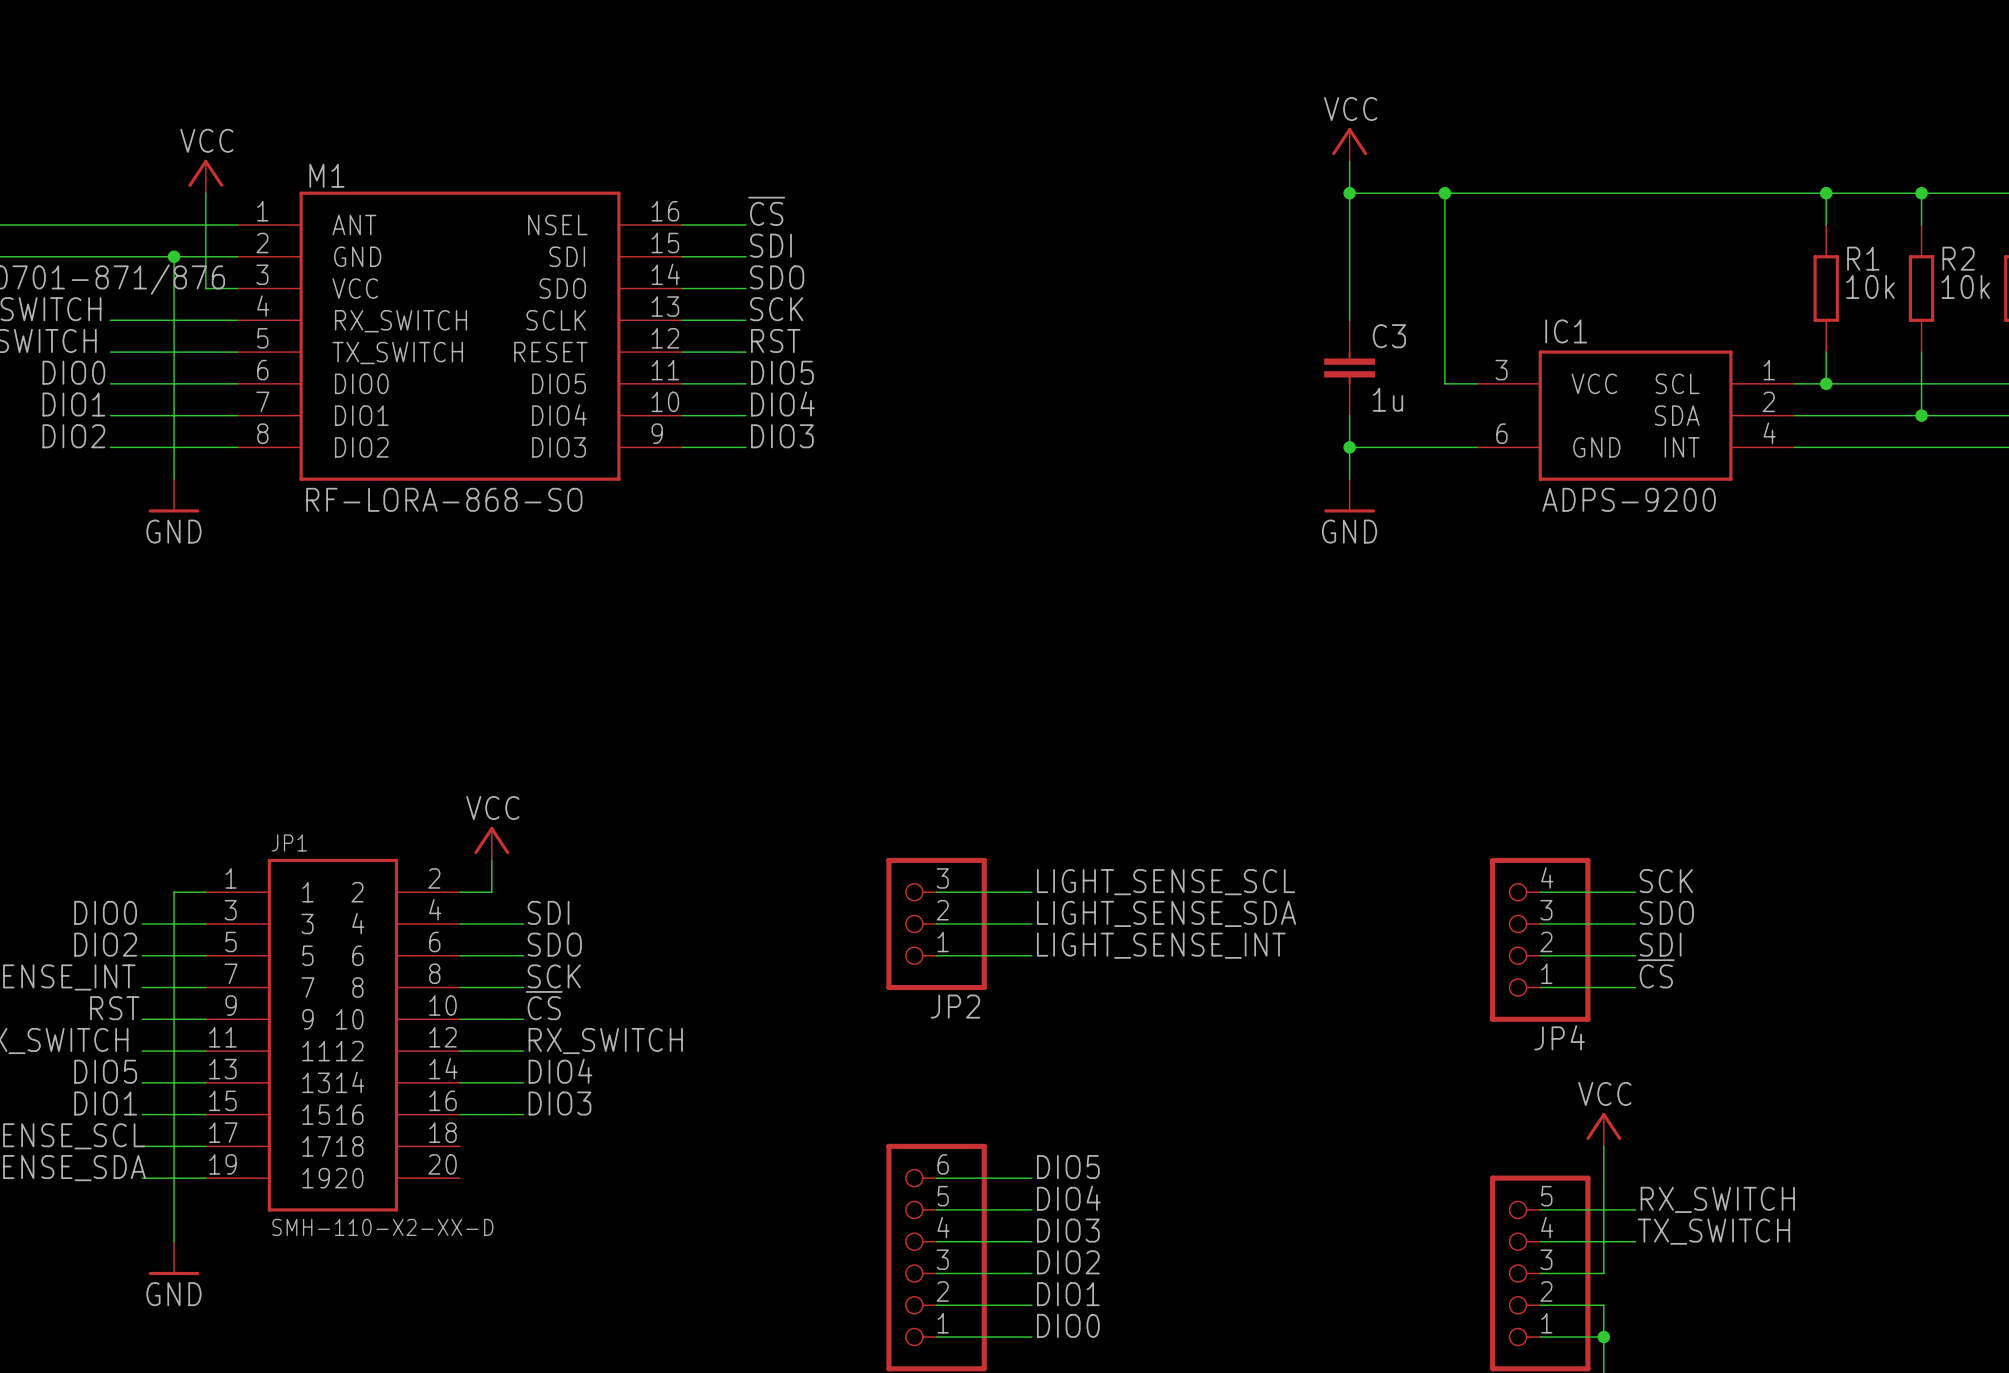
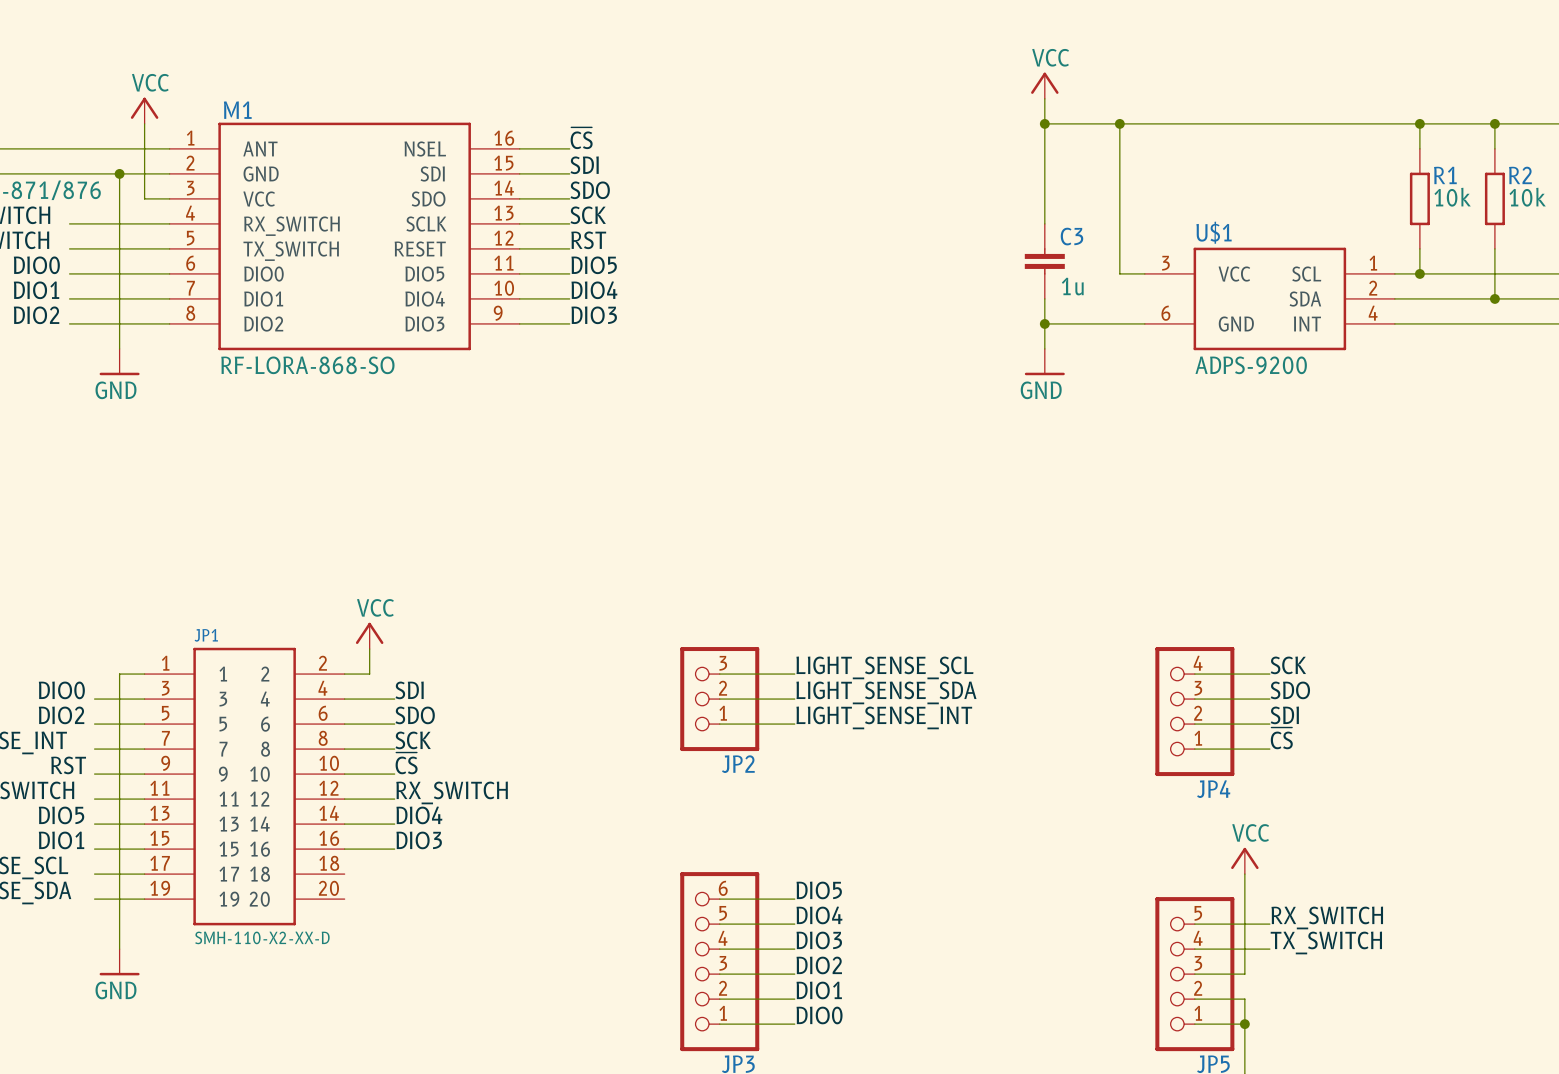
IC1 name: IC1 (1566, 331) -> U$1 (1214, 232)

